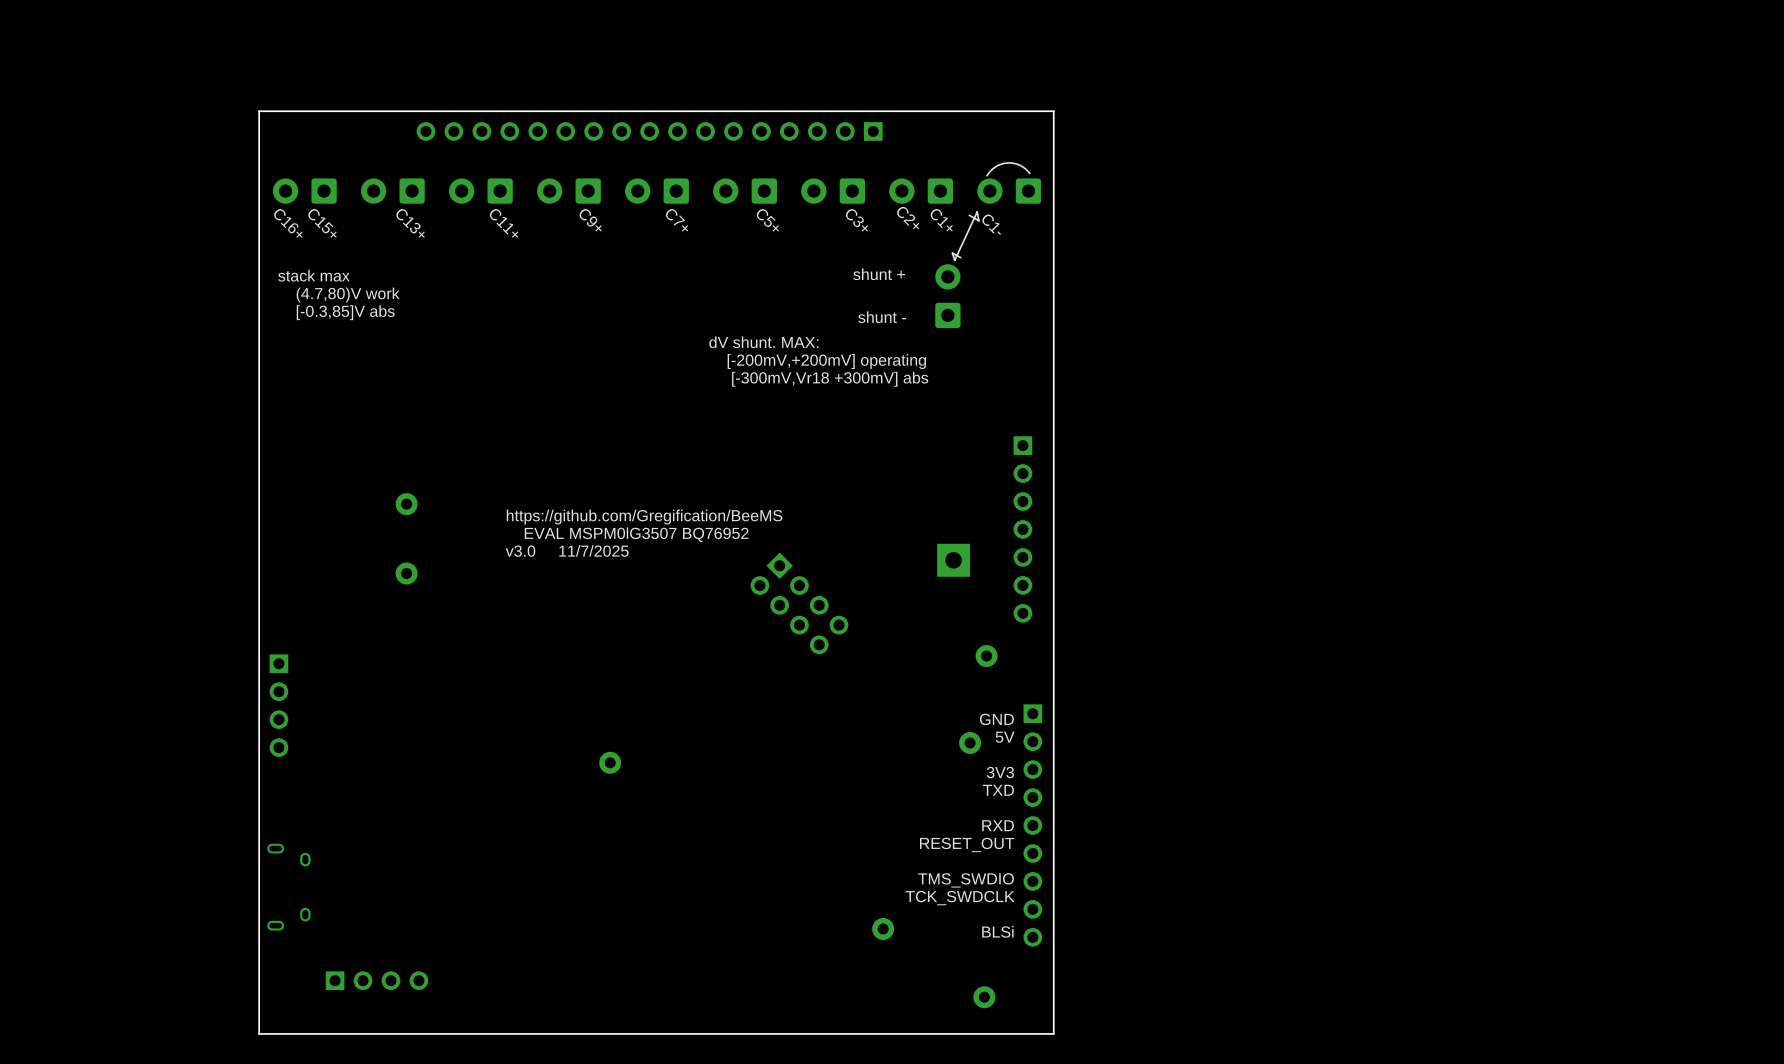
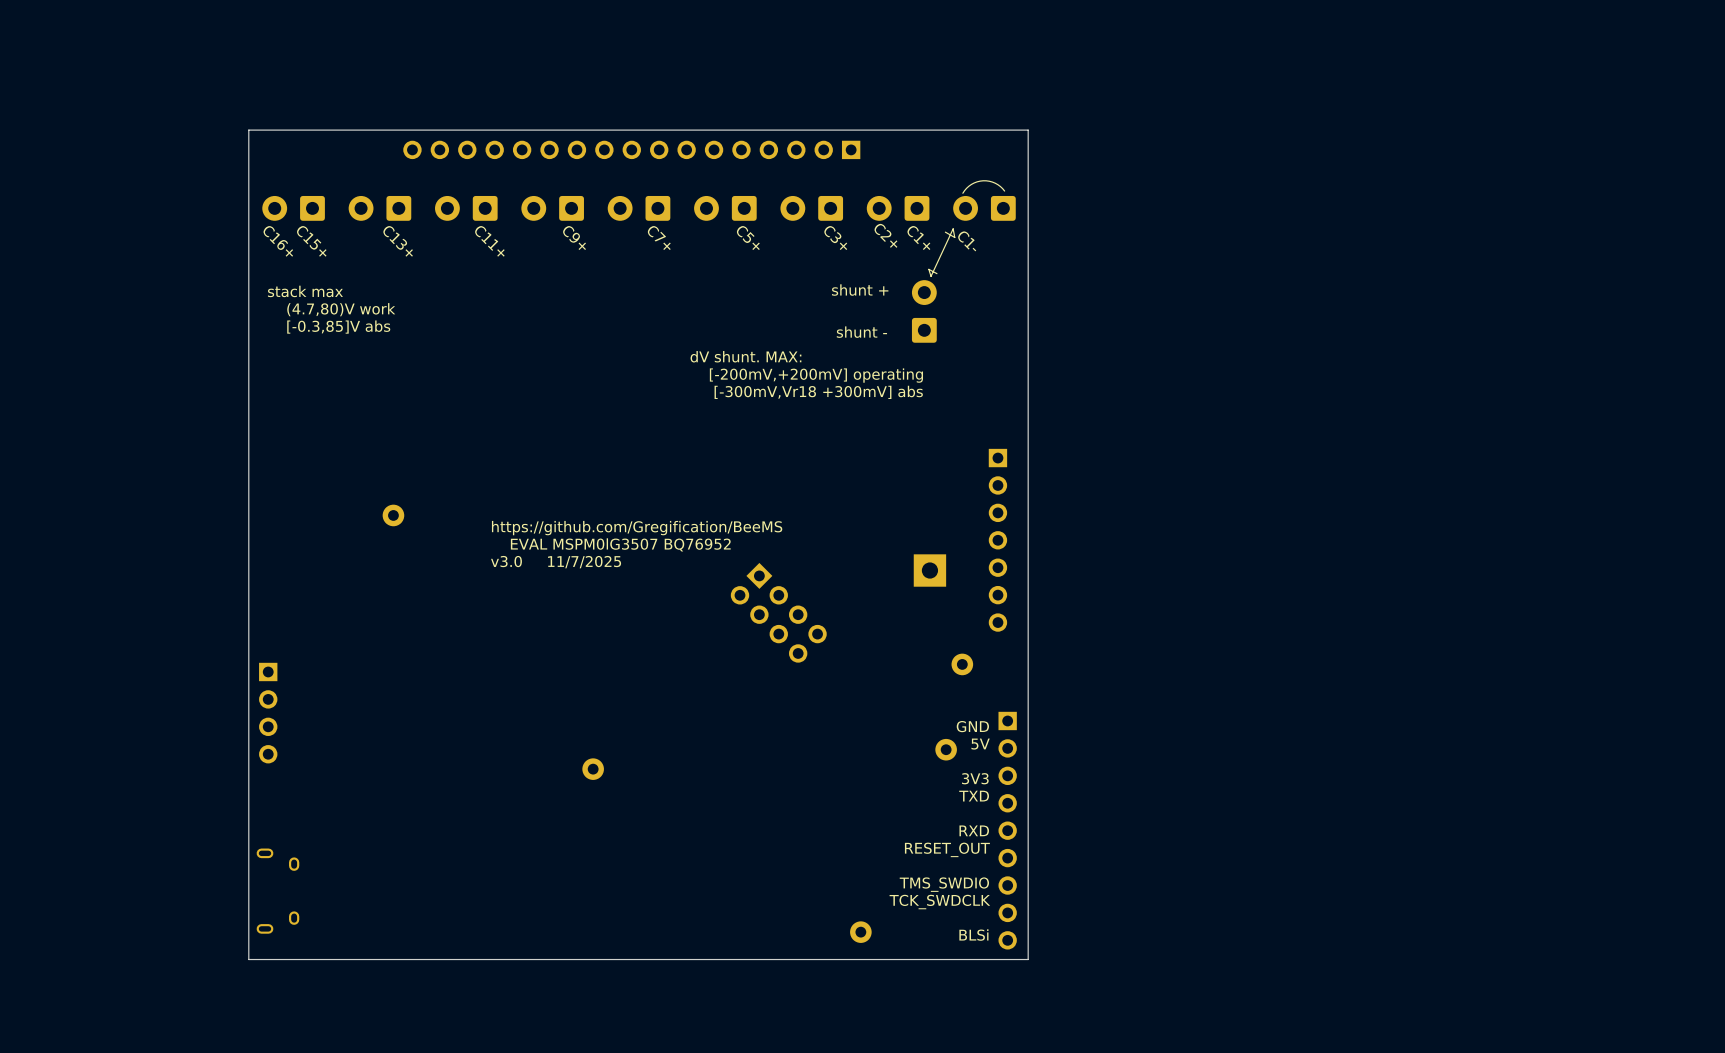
part: (406, 573) -> none
board edge: (1053, 956) (1053, 1033) (259, 1033) (259, 956) -> (1028, 959) (248, 959)
part: (377, 980) -> none
part: (984, 997) -> none

